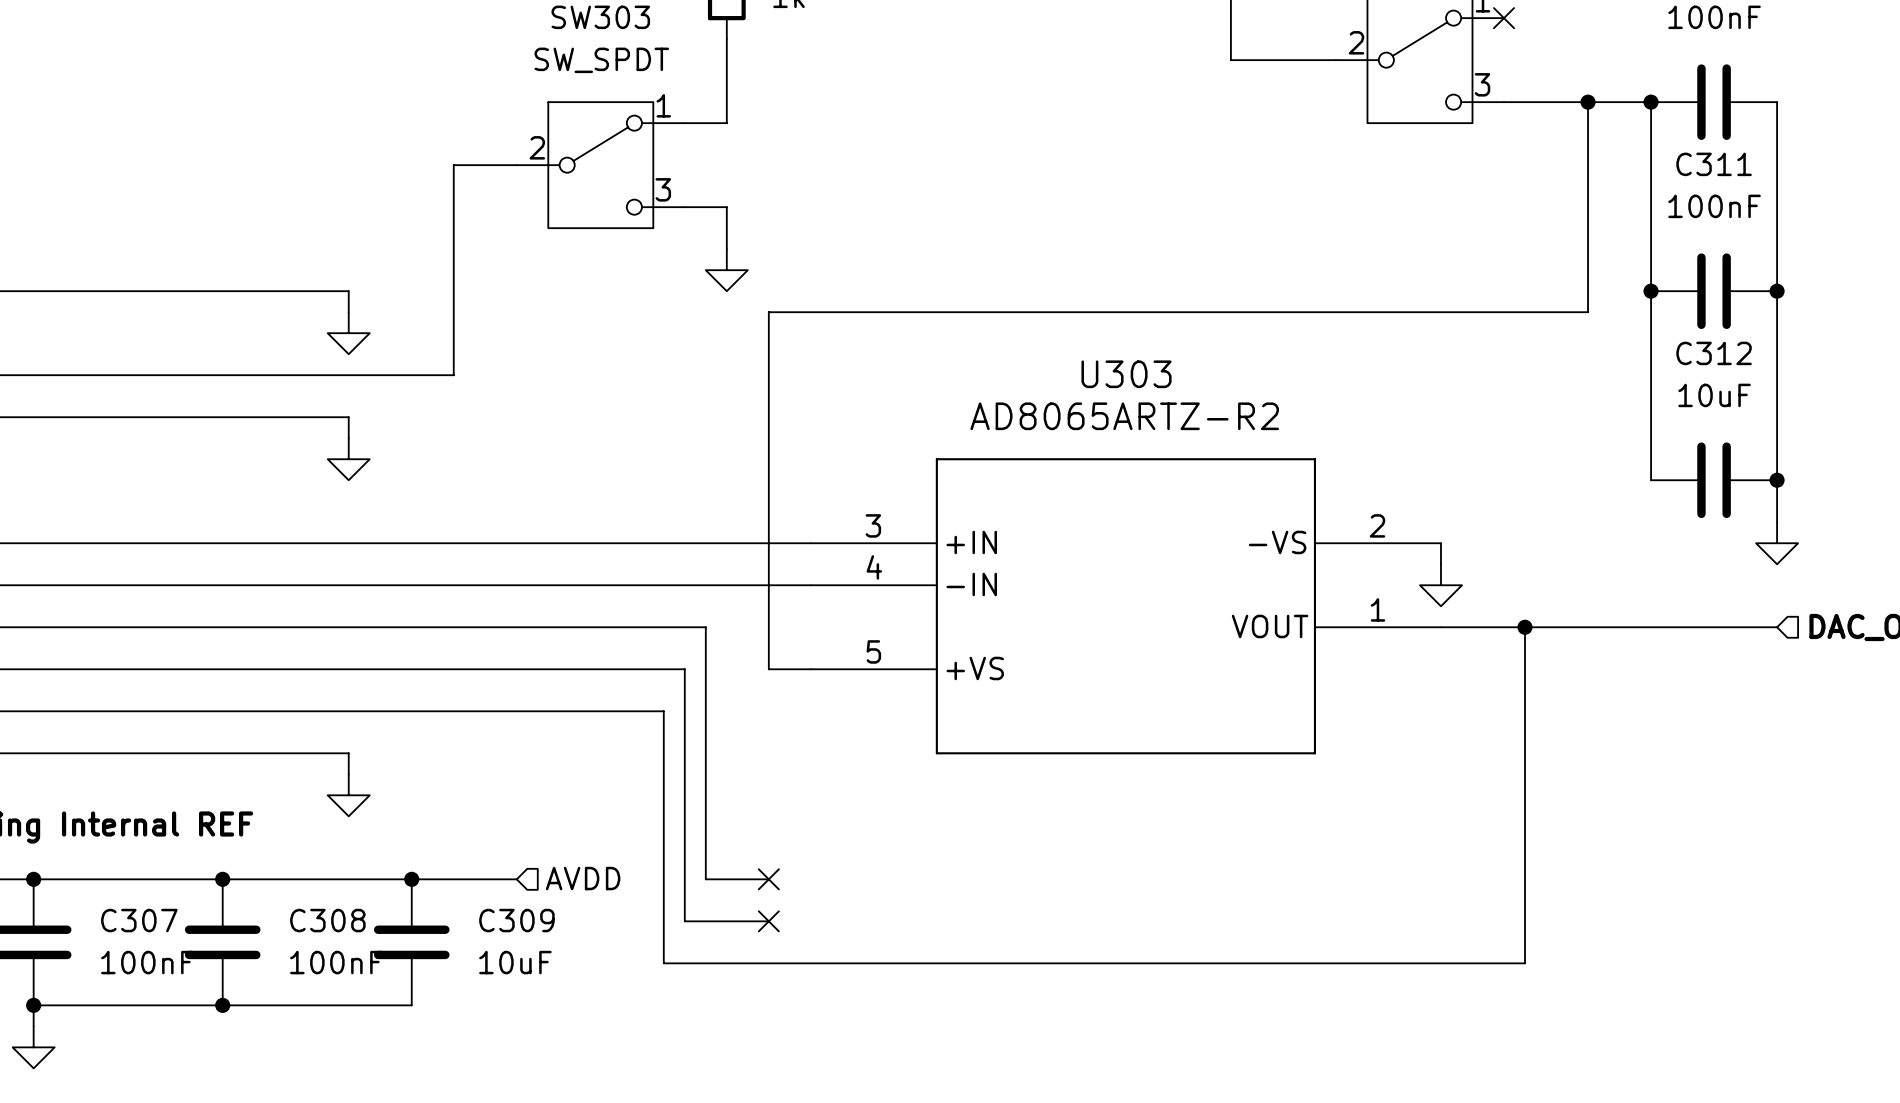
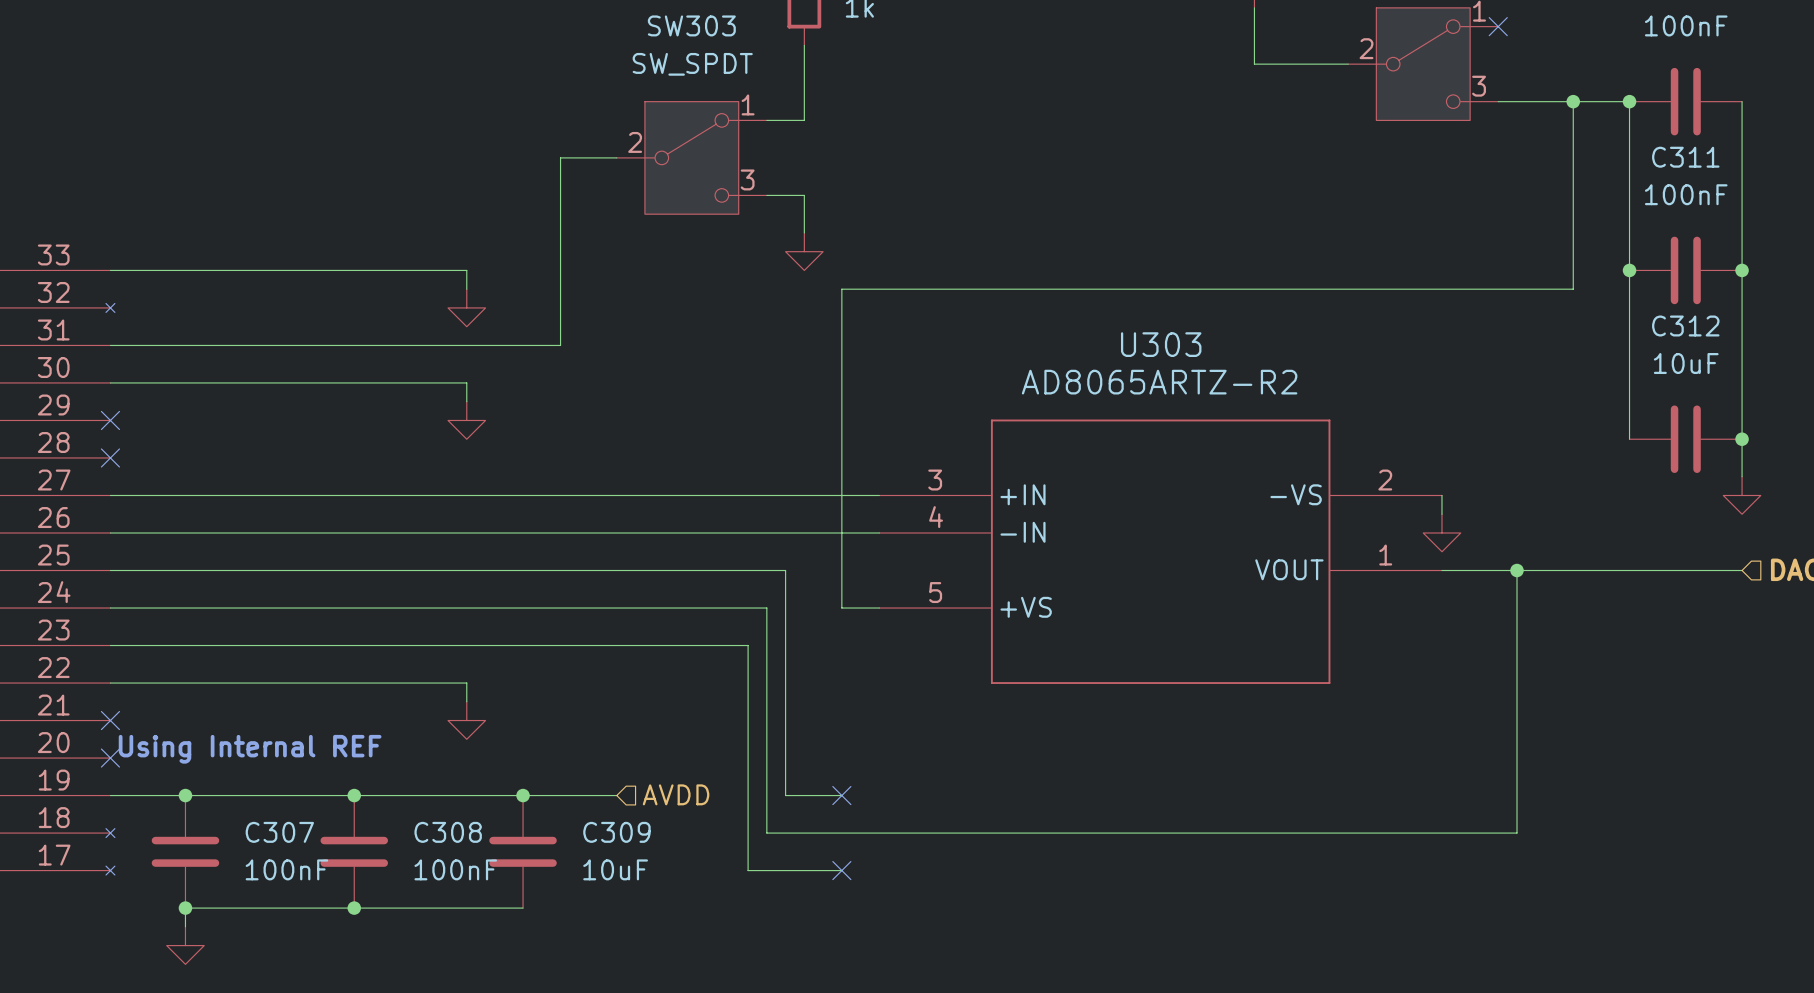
no-connect mark position: (768, 921) -> (841, 870)
wire: (1525, 921) (1525, 963) (768, 963) -> (1517, 833) (841, 833)

